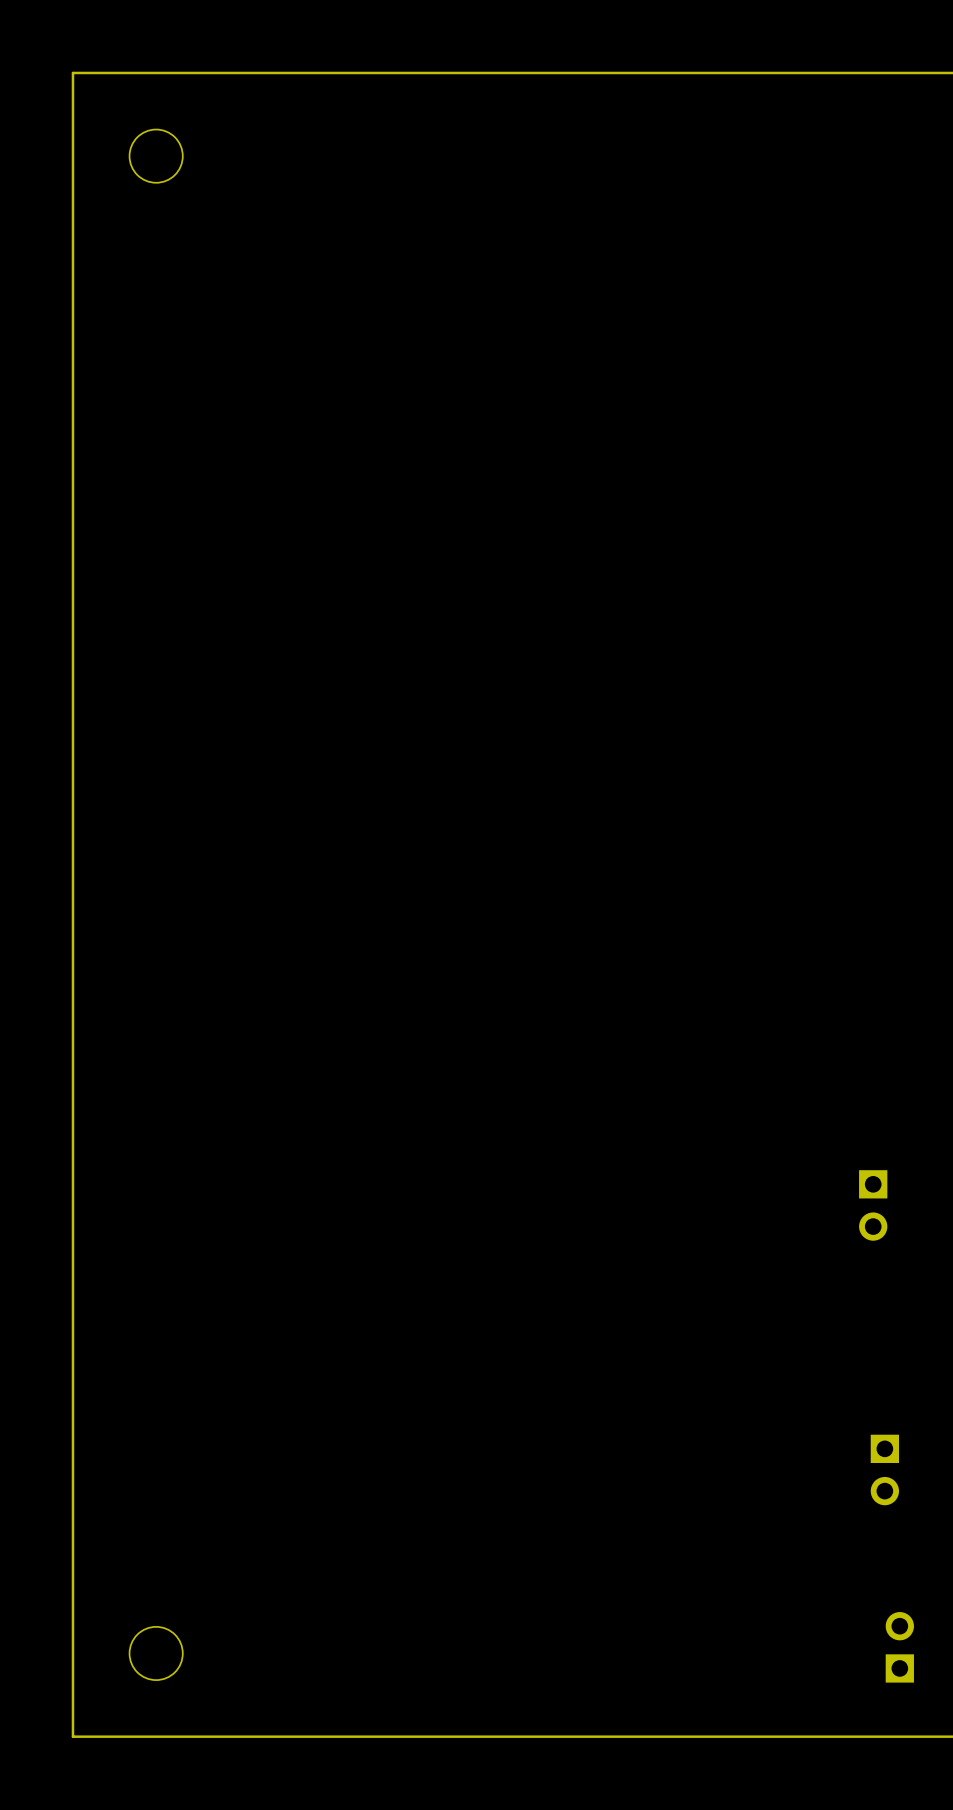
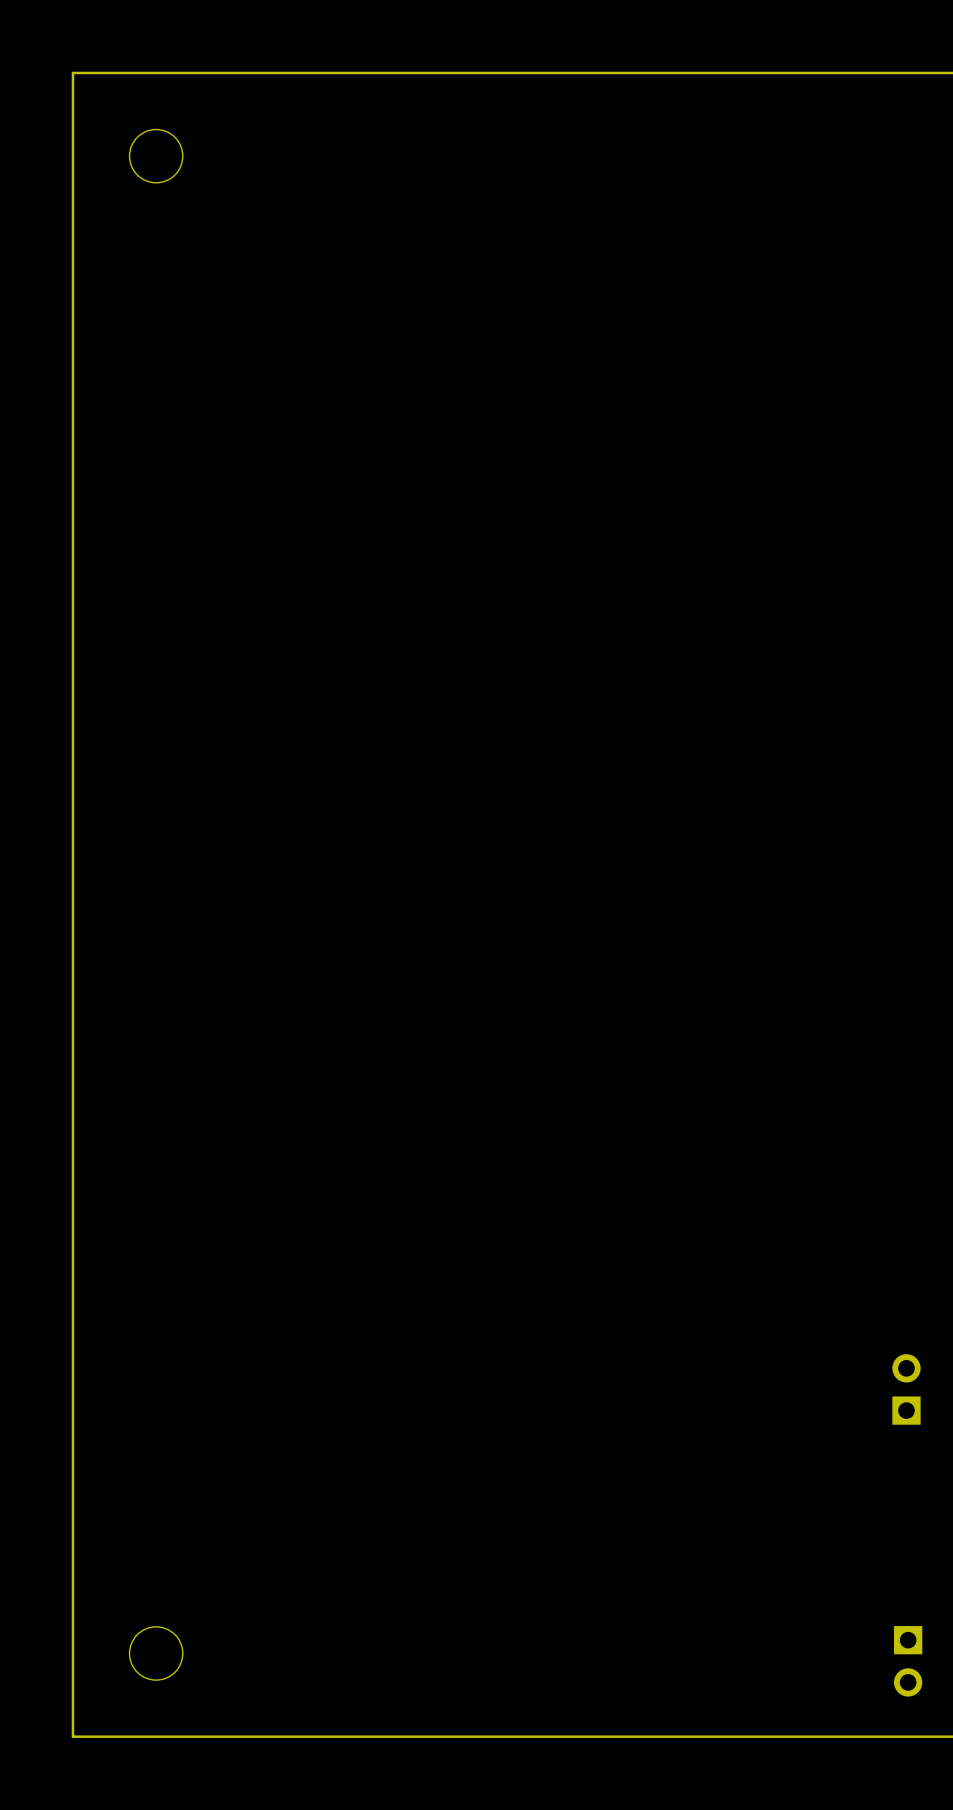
part: (873, 1205) -> none
part rotation: 0° (884, 1469) -> 180° (906, 1389)
part position: (884, 1469) -> (906, 1389)
part rotation: 0° (899, 1647) -> 180° (908, 1661)

